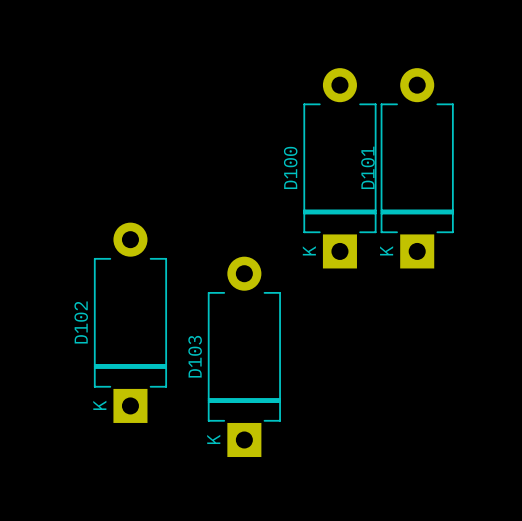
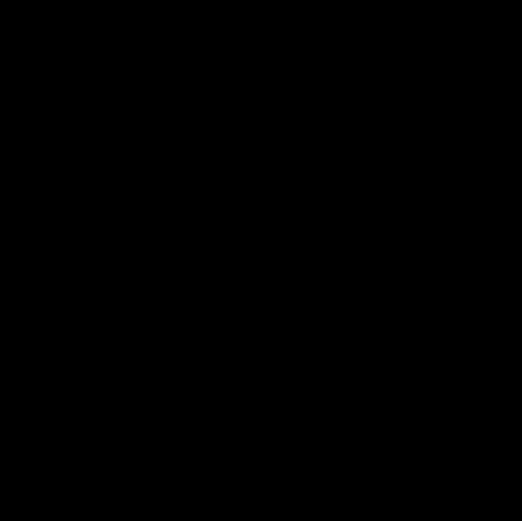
D100: (339, 168) -> none
D101: (417, 168) -> none
D102: (130, 322) -> none
D103: (244, 356) -> none

